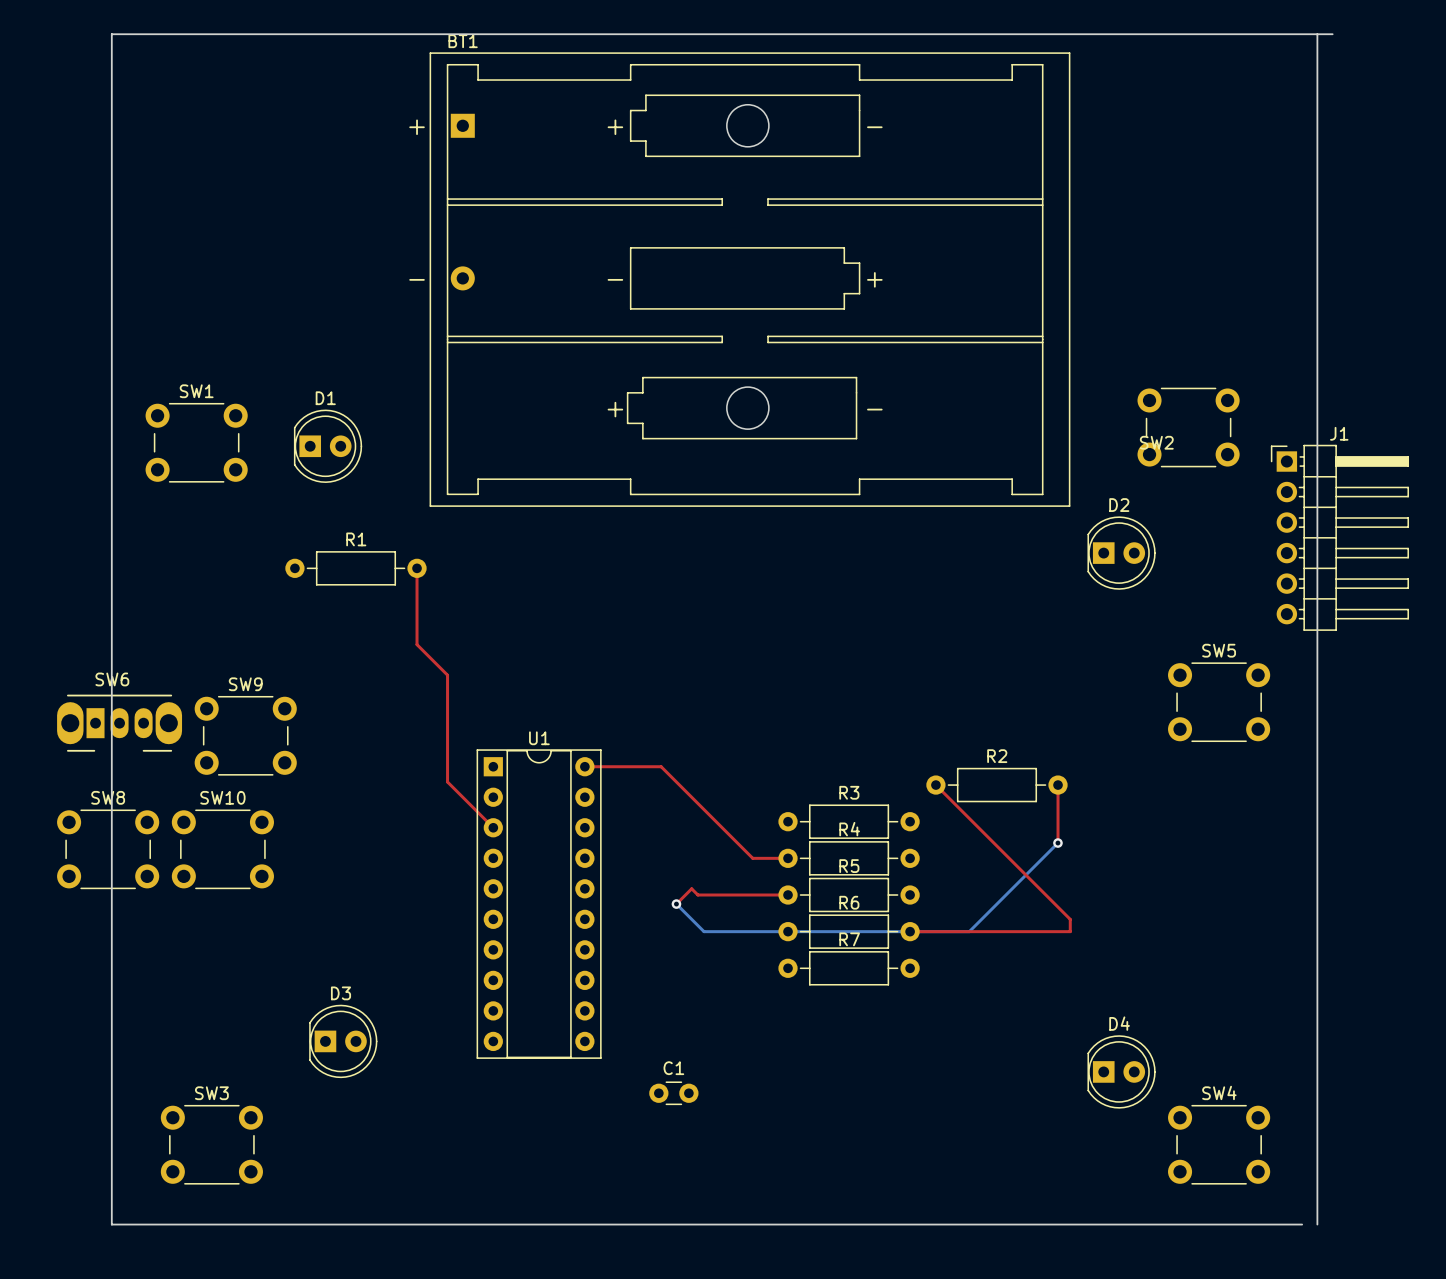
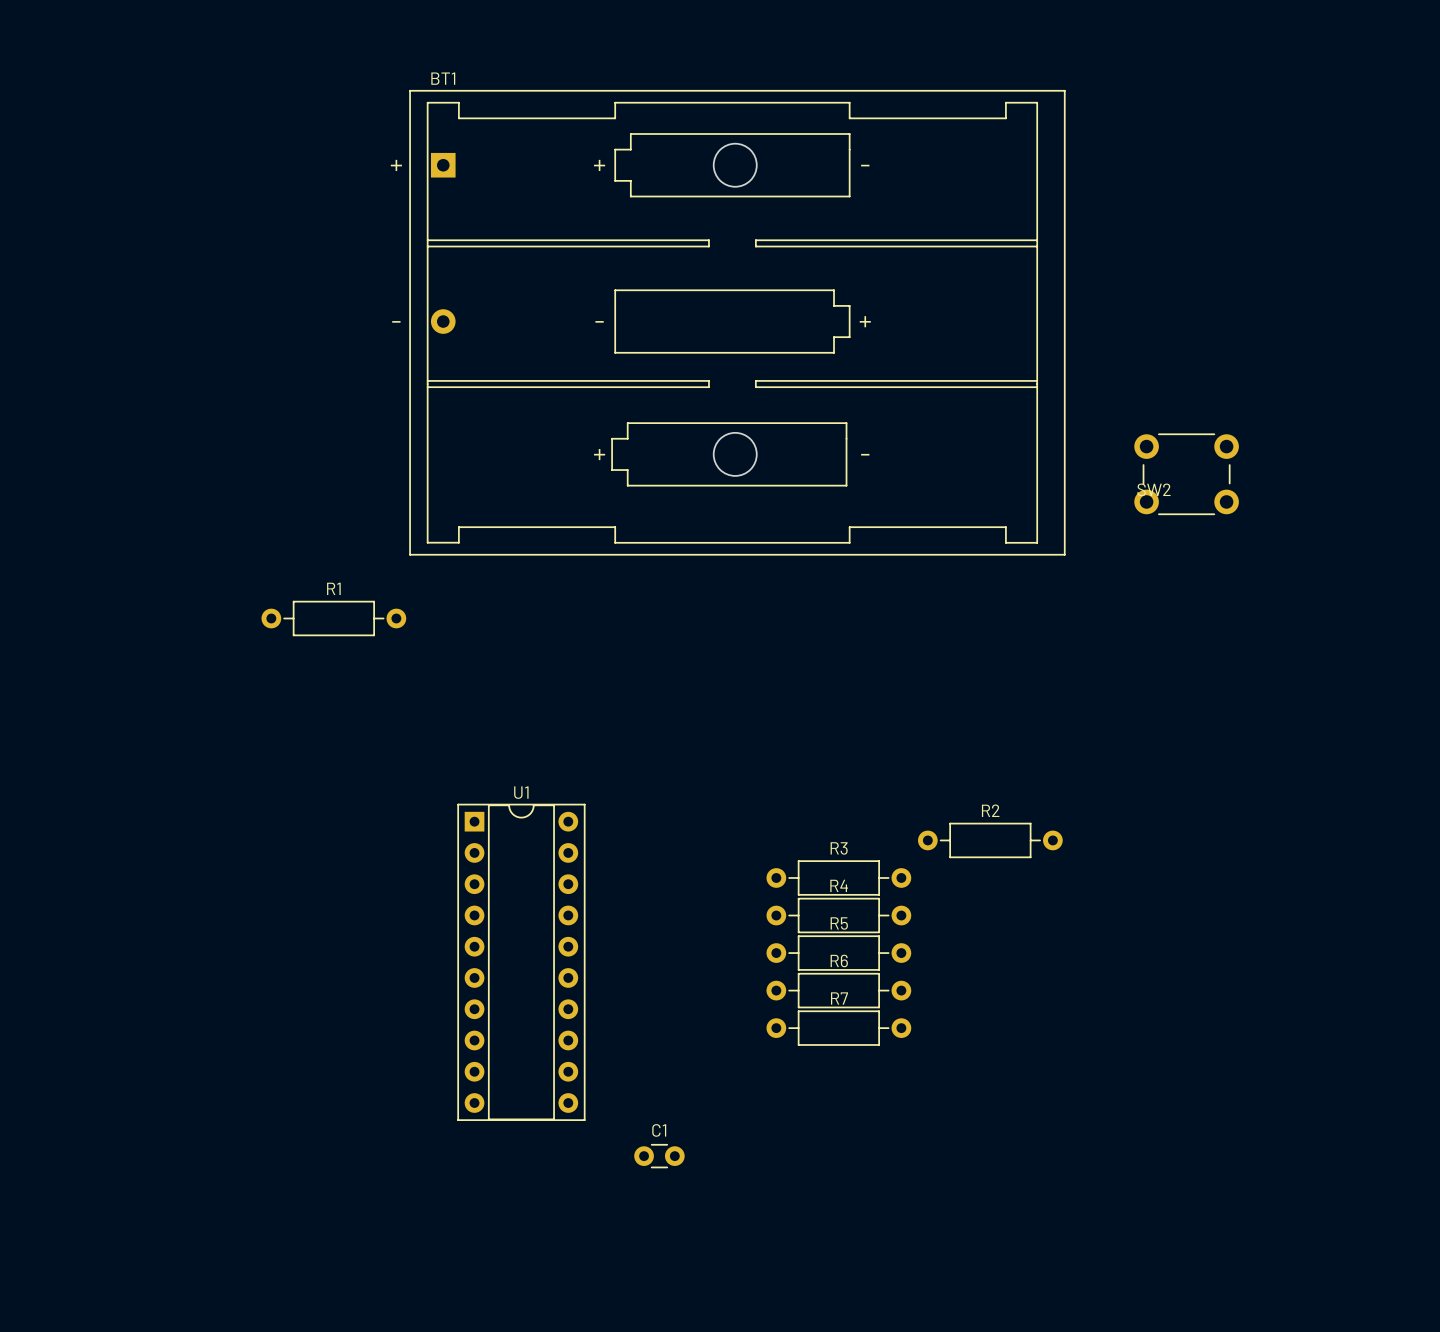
board edge: (1317, 34) (1317, 1224) -> none
board edge: (1332, 34) (111, 34) (111, 1224) (1302, 1224) -> none
SW1: (196, 442) -> none
D1: (328, 446) -> none
J1: (1339, 537) -> none
D2: (1121, 553) -> none
top track: (417, 568) (417, 644) (447, 675) (447, 781) (493, 827) -> none
SW5: (1219, 702) -> none
SW6: (119, 723) -> none
SW9: (245, 735) -> none
top track: (584, 766) (661, 766) (752, 858) (788, 858) -> none
top track: (935, 785) (1070, 919) (1070, 931) (910, 931) -> none
top track: (1058, 785) (1058, 842) -> none
bottom track: (1057, 843) (969, 931) (704, 931) (676, 904) -> none
via: (1057, 843) -> none
SW8: (108, 849) -> none
SW10: (222, 849) -> none
top track: (788, 895) (697, 895) (691, 888) (676, 904) -> none
via: (676, 904) -> none
D3: (343, 1041) -> none
D4: (1121, 1071) -> none
SW3: (211, 1144) -> none
SW4: (1219, 1144) -> none

